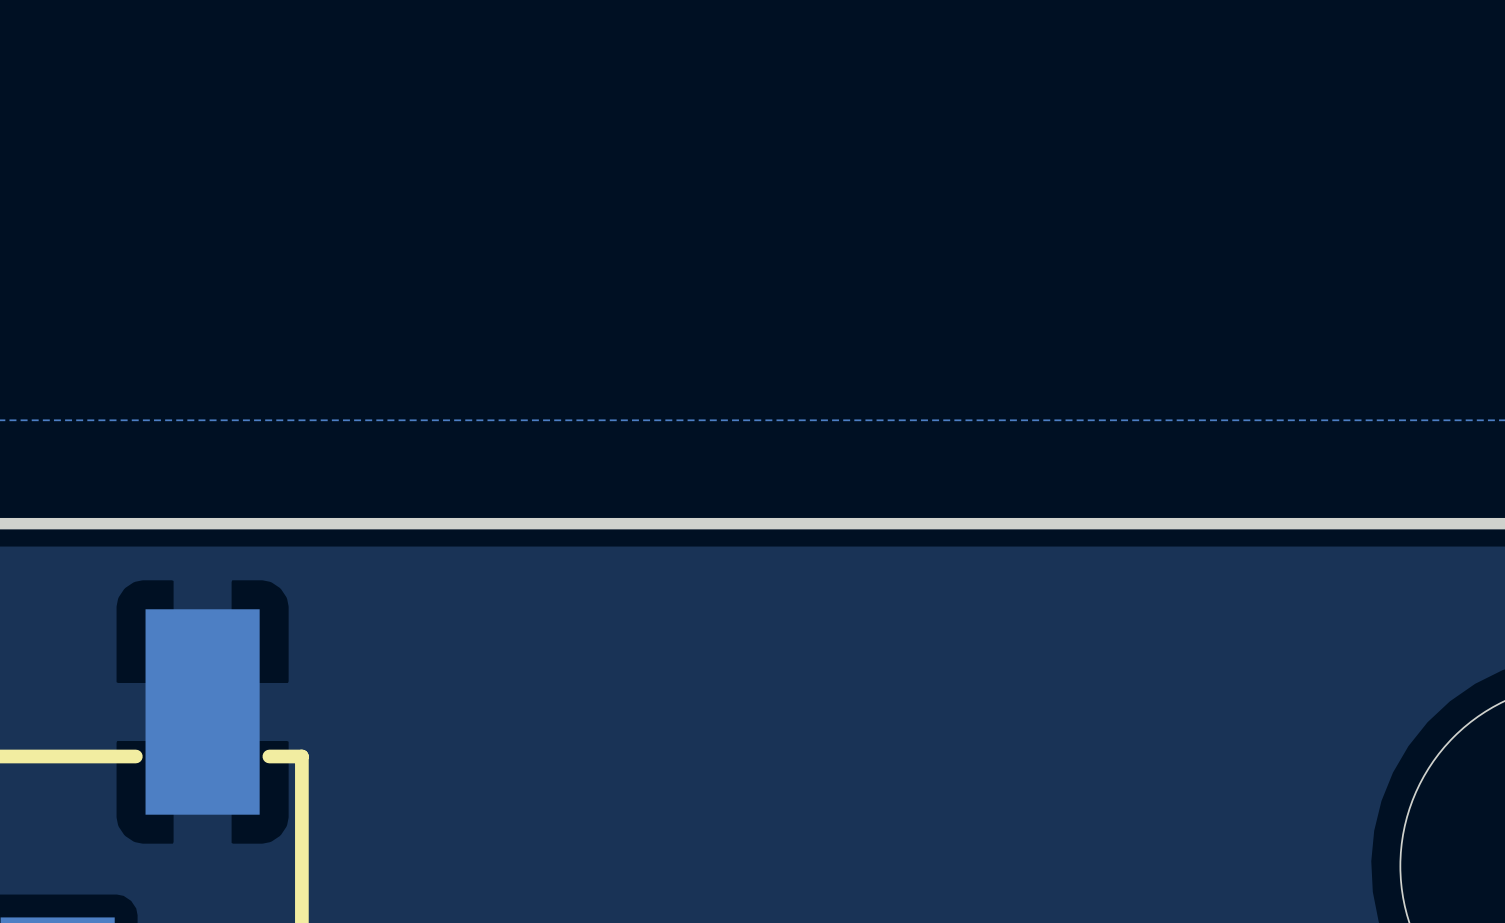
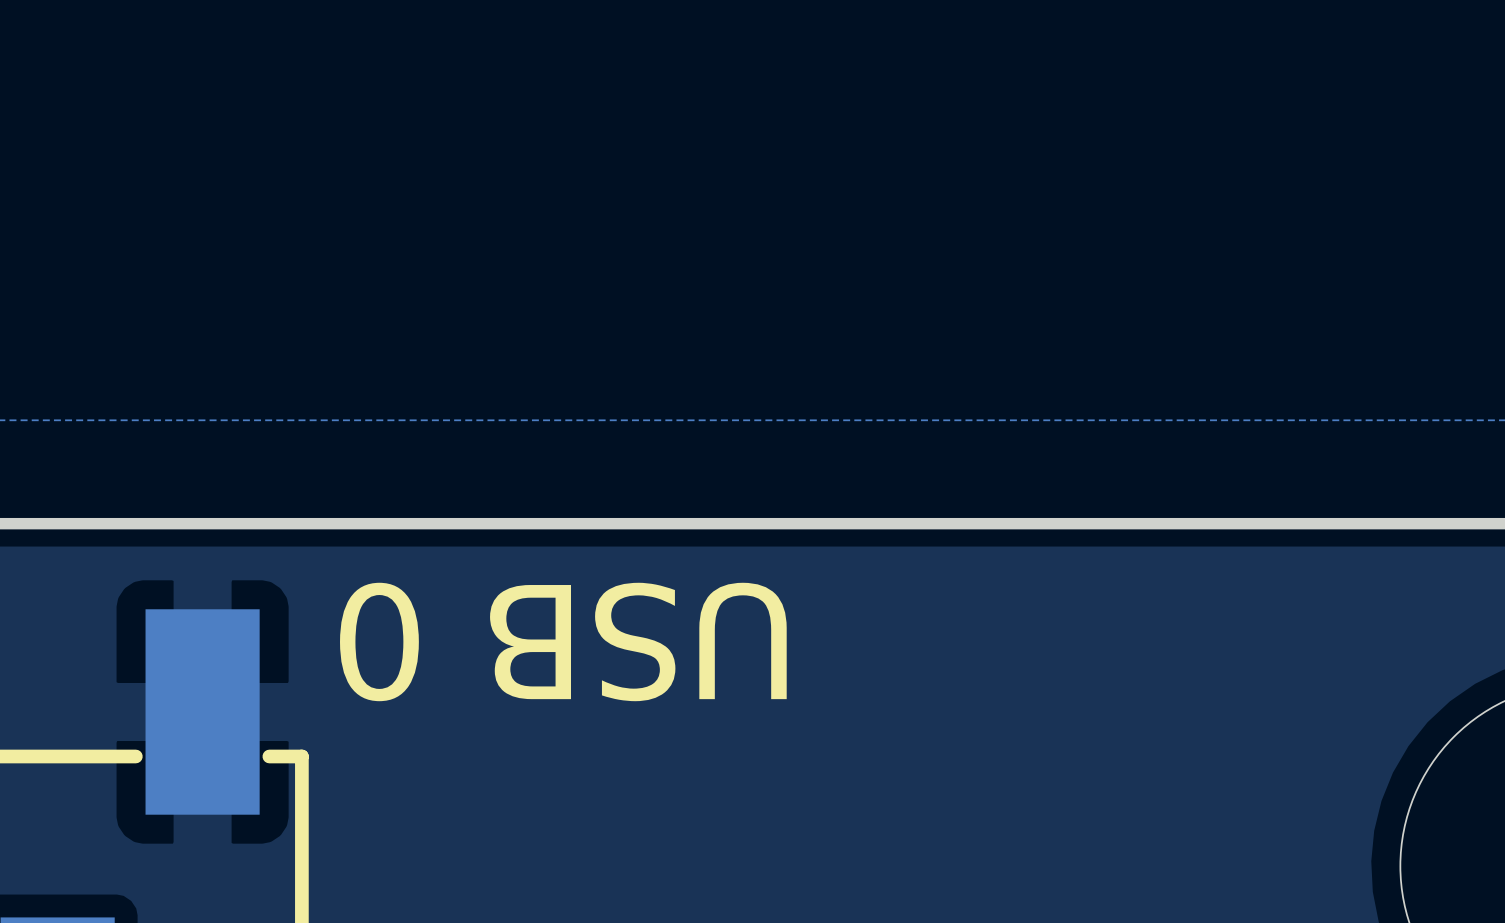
text: none -> USB 0 (563, 641)

